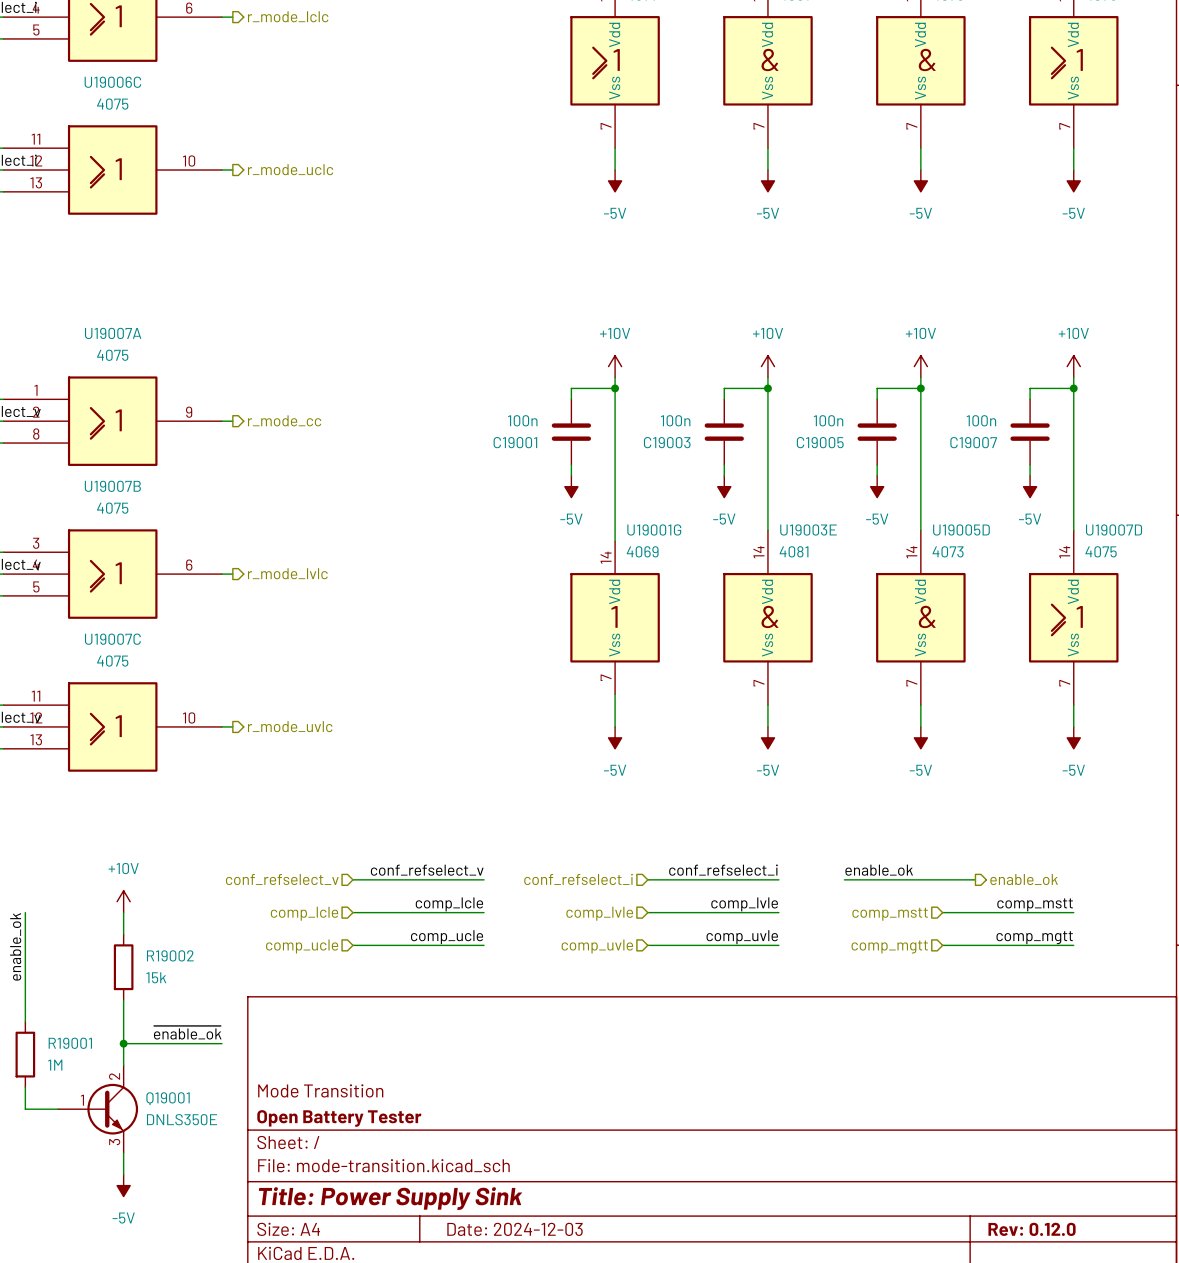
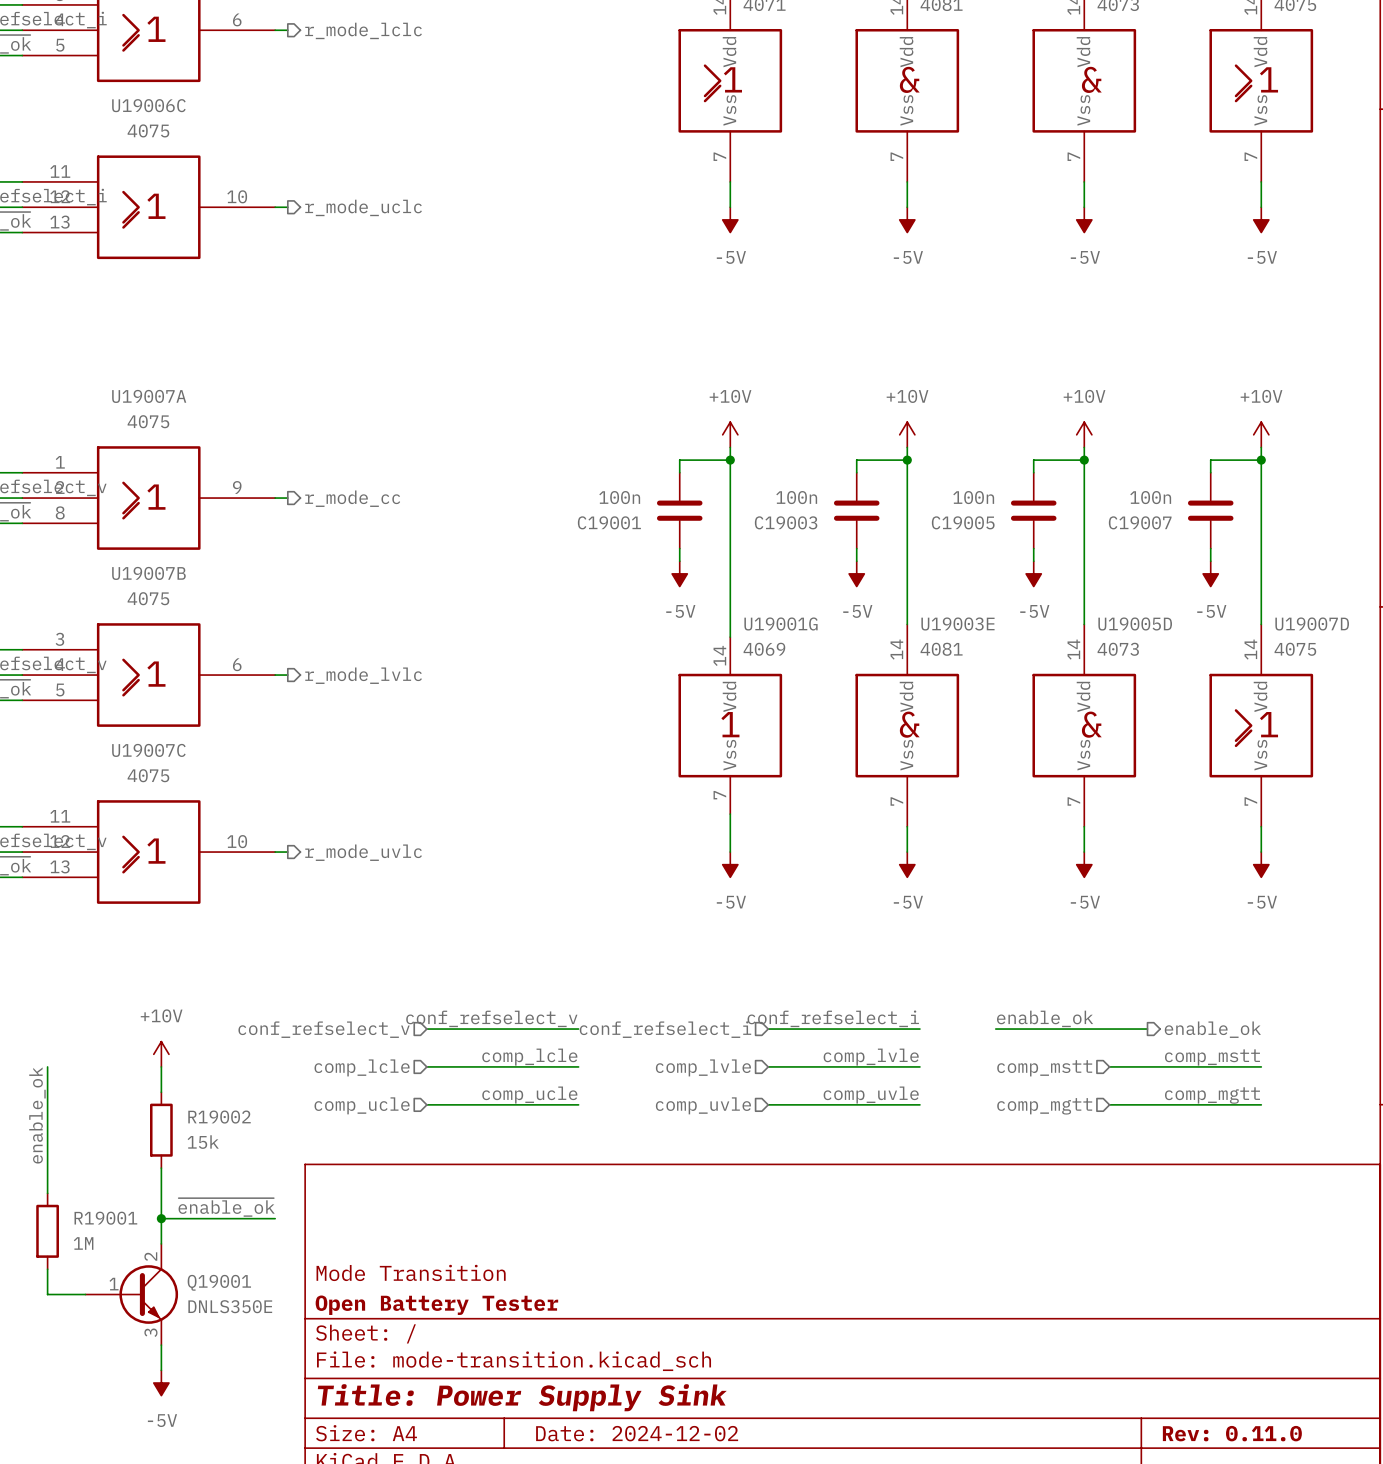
title block: Date: 2024-12-03 (515, 1229) -> Date: 2024-12-02 (637, 1433)
title block: Rev: 0.12.0 (1032, 1229) -> Rev: 0.11.0 (1232, 1433)

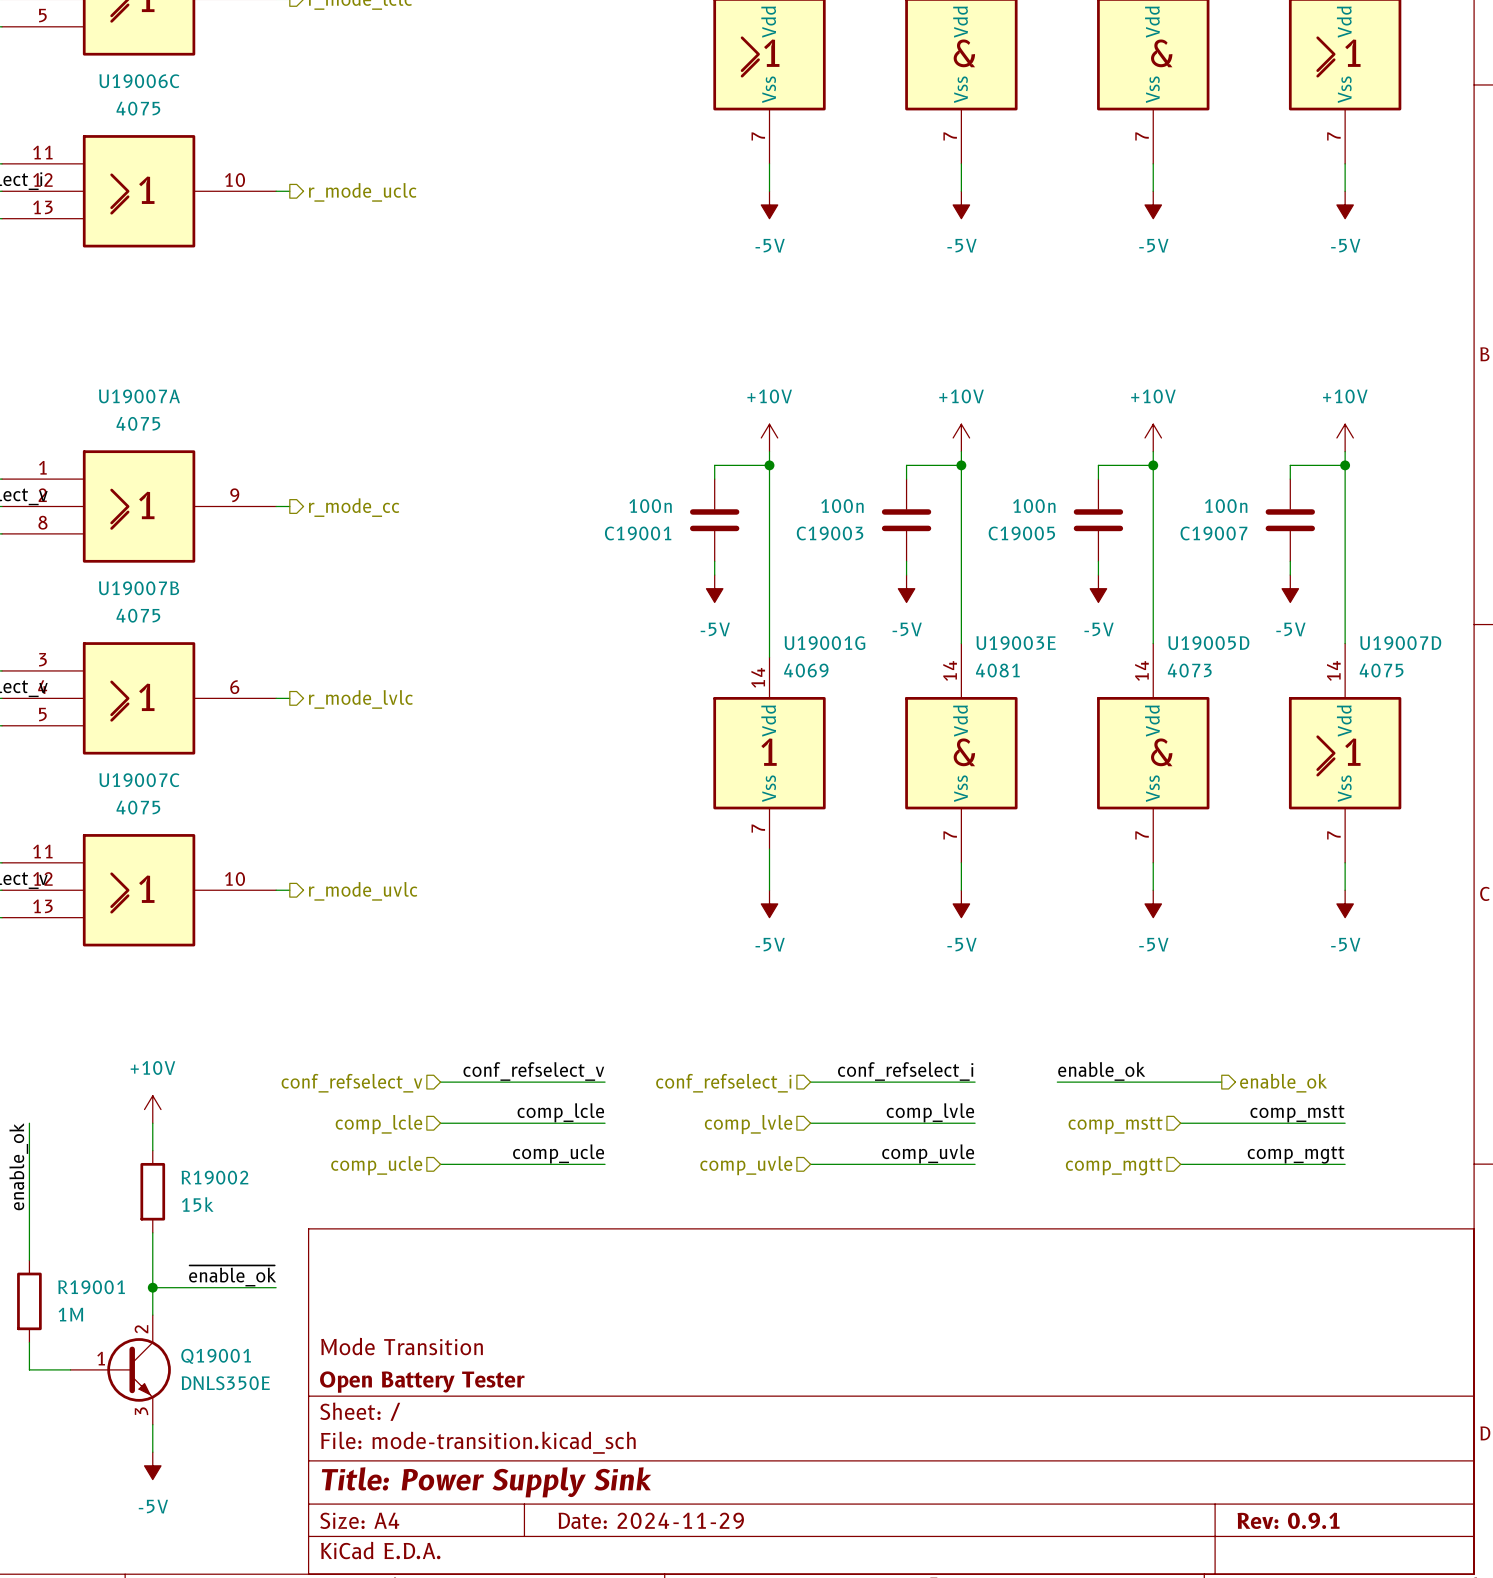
title block: Date: 2024-12-02 (637, 1433) -> Date: 2024-11-29 (651, 1520)
title block: Rev: 0.11.0 (1232, 1433) -> Rev: 0.9.1 (1288, 1520)

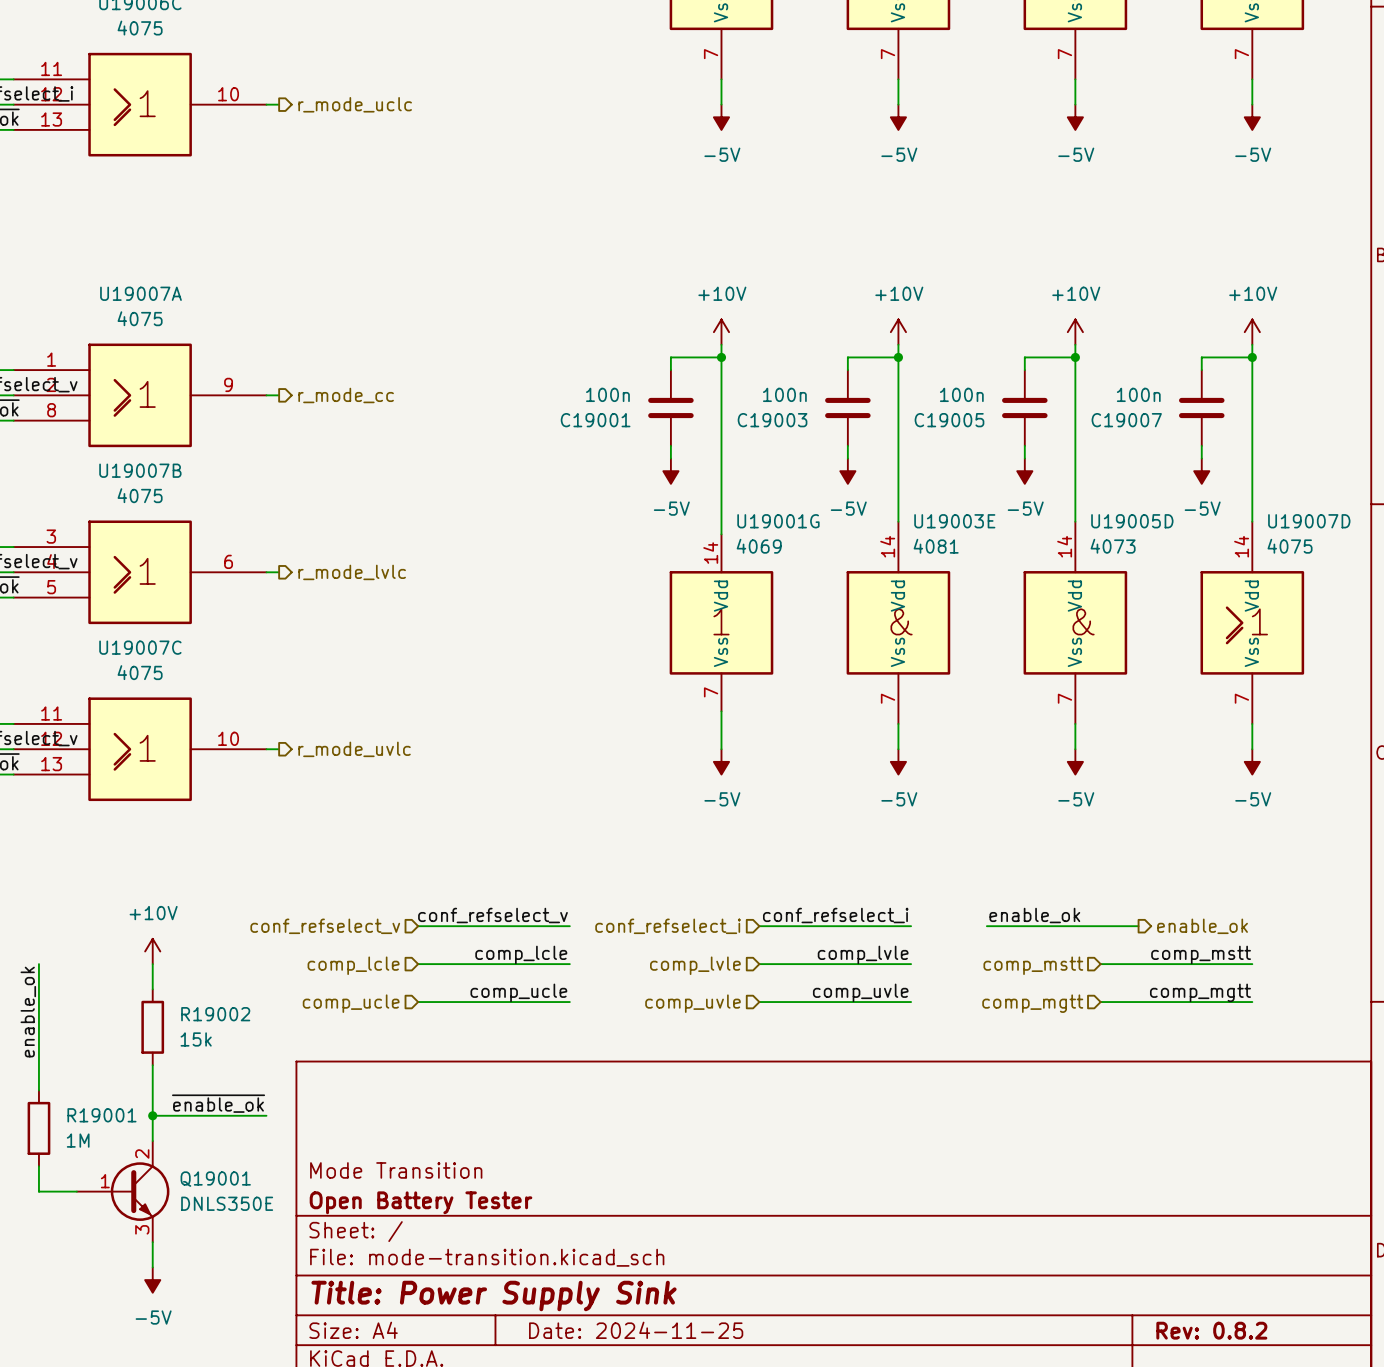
title block: Date: 2024-11-29 (651, 1520) -> Date: 2024-11-25 (636, 1330)
title block: Rev: 0.9.1 (1288, 1520) -> Rev: 0.8.2 (1211, 1330)

